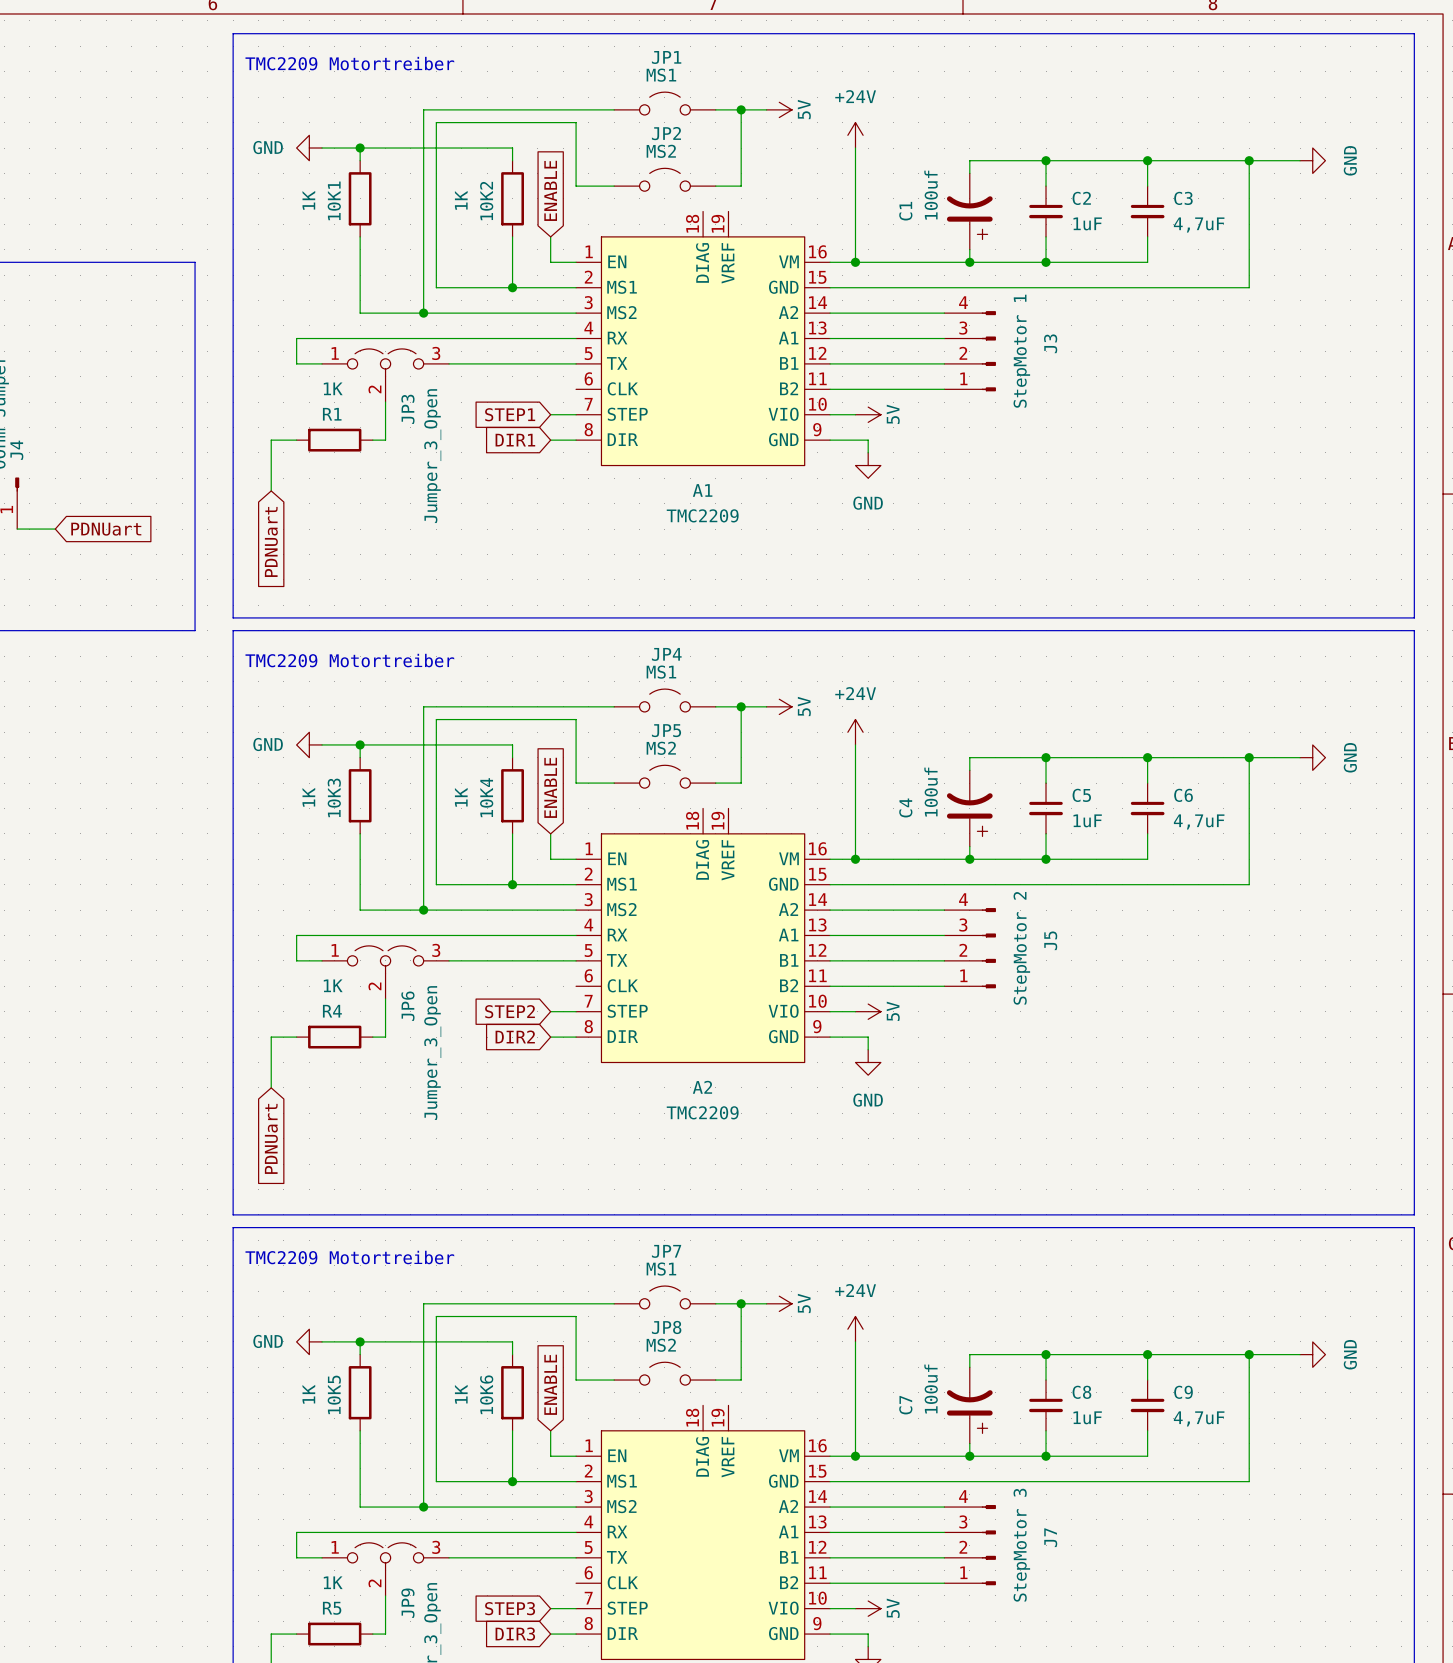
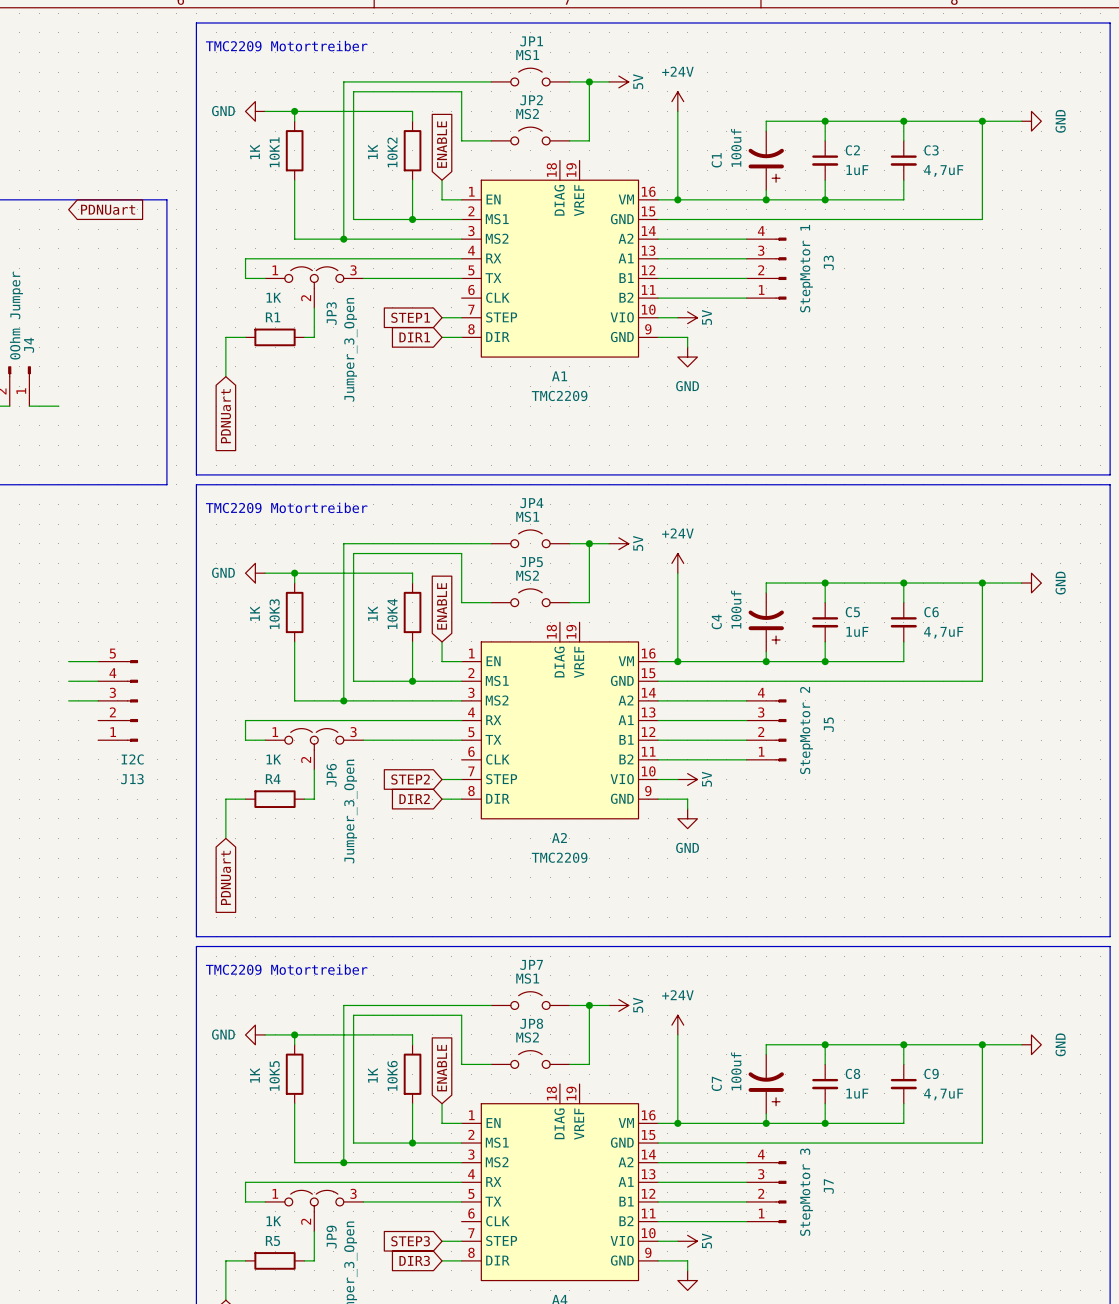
global label: none -> PDNUart (108, 209)
global label: PDNUart (106, 529) -> none
wire: none -> (68, 661) (98, 661)
wire: none -> (68, 681) (98, 681)
wire: none -> (68, 700) (98, 700)
J13: none -> I2C (118, 700)

